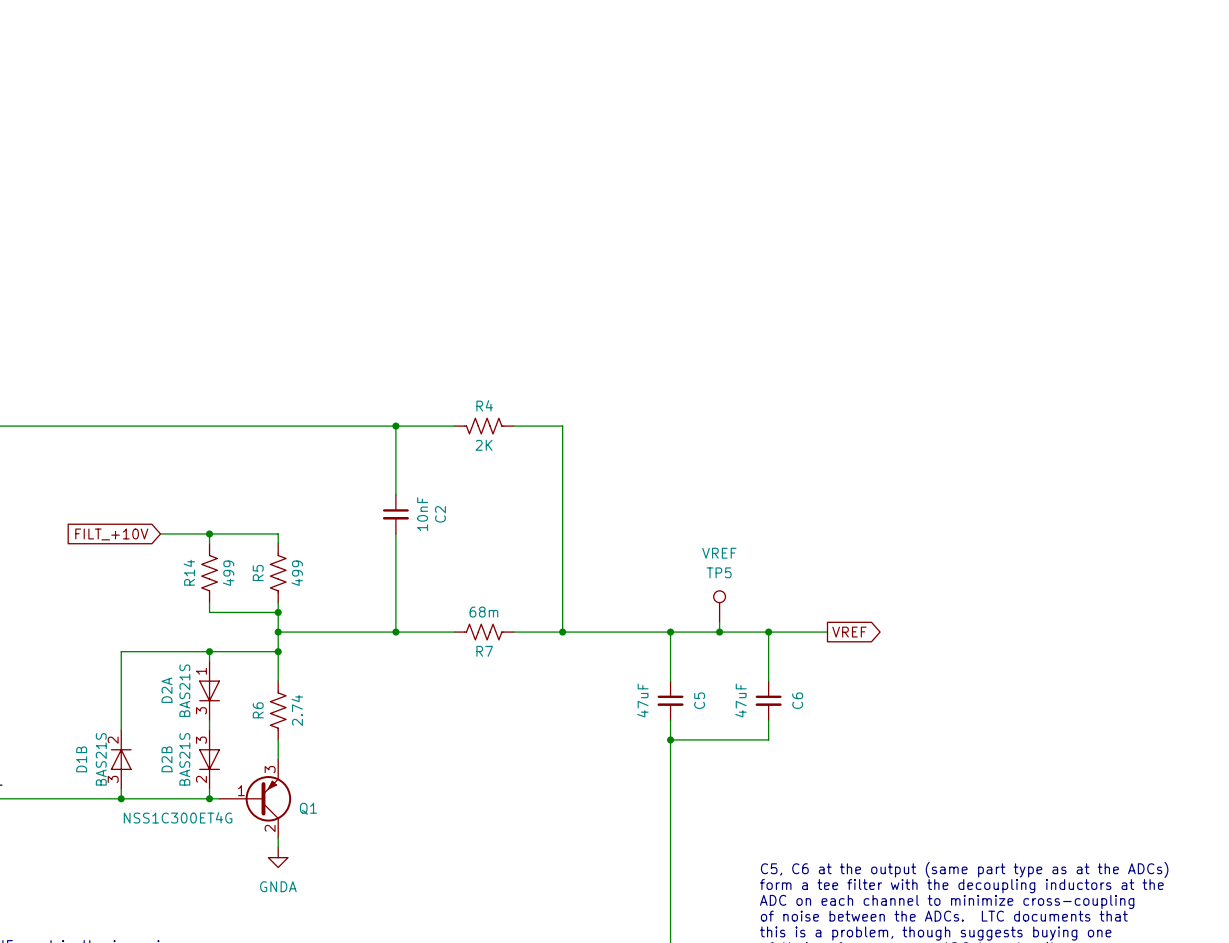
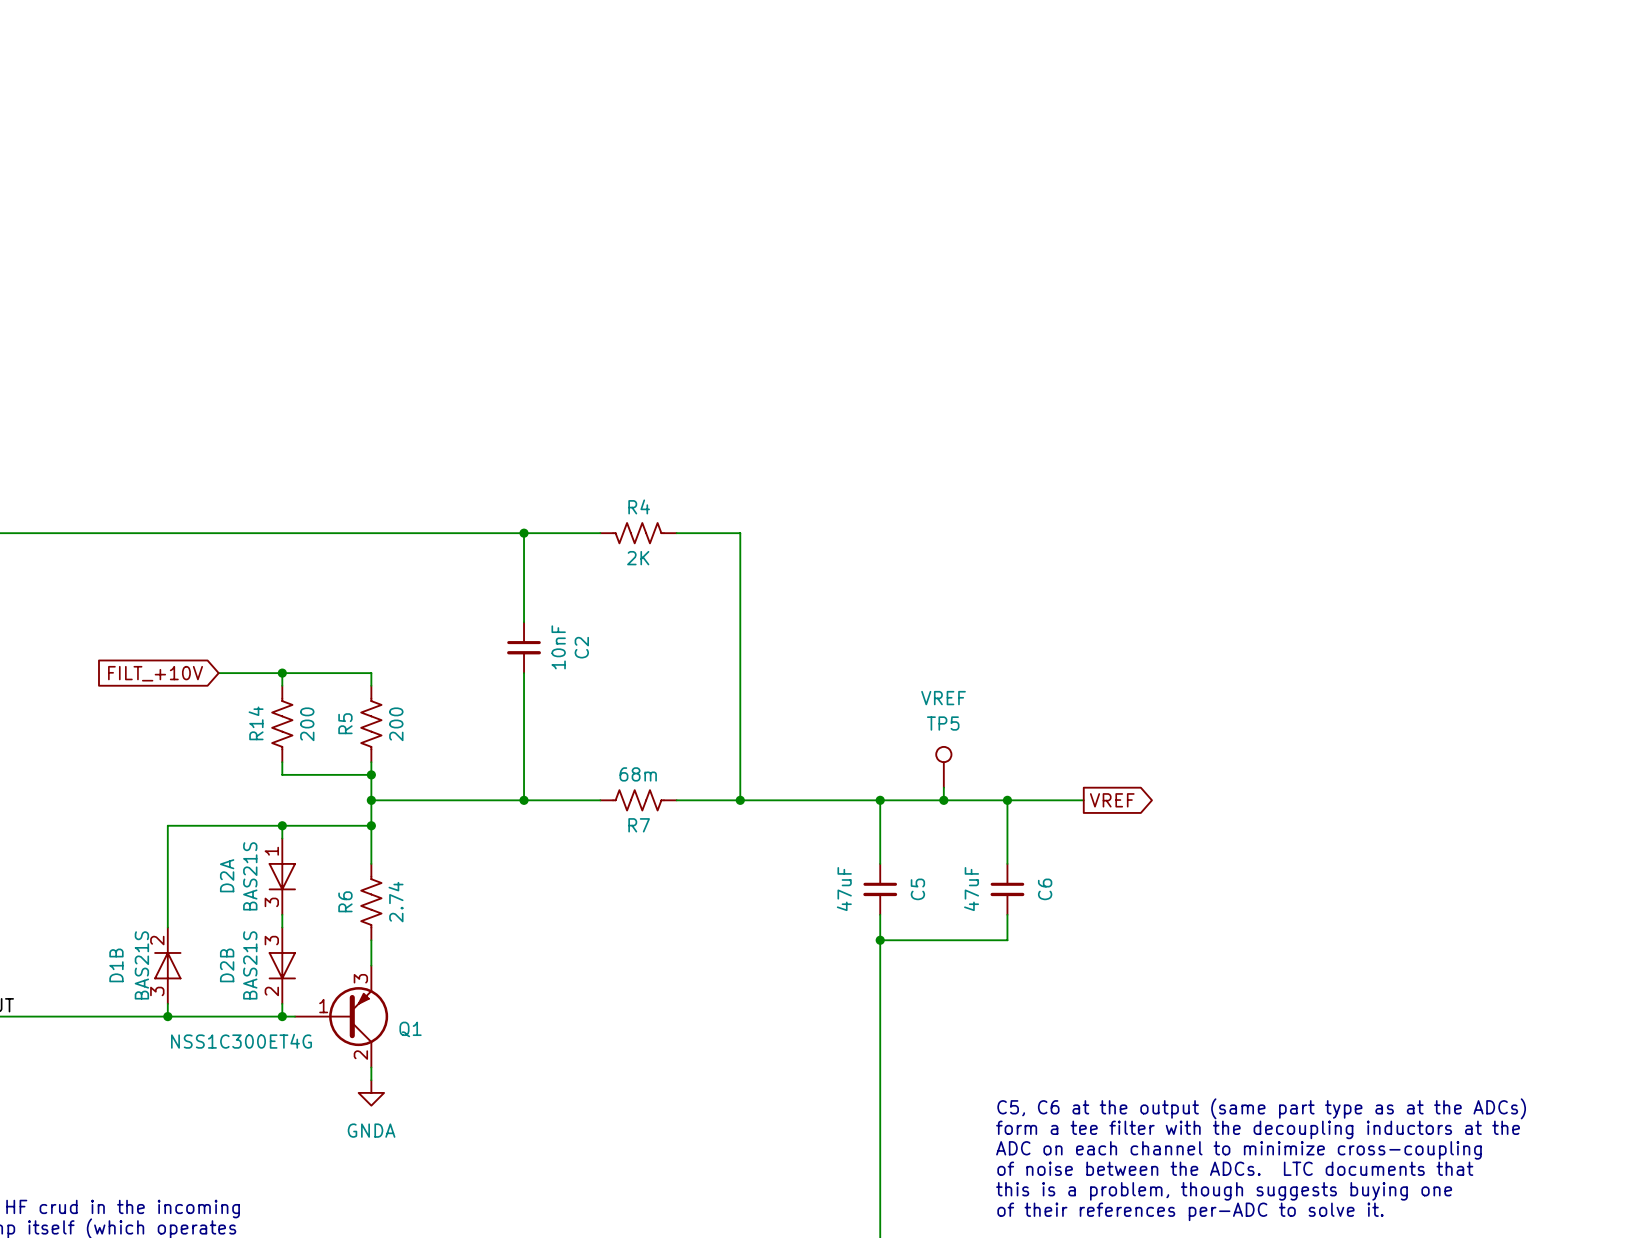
R14 value: 499 (228, 573) -> 200 (307, 724)
R5 value: 499 (297, 573) -> 200 (396, 724)

